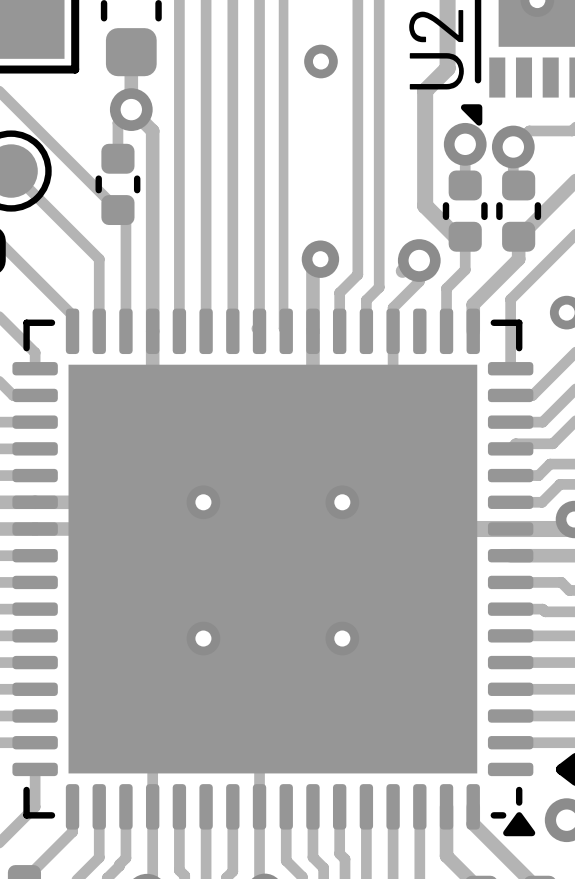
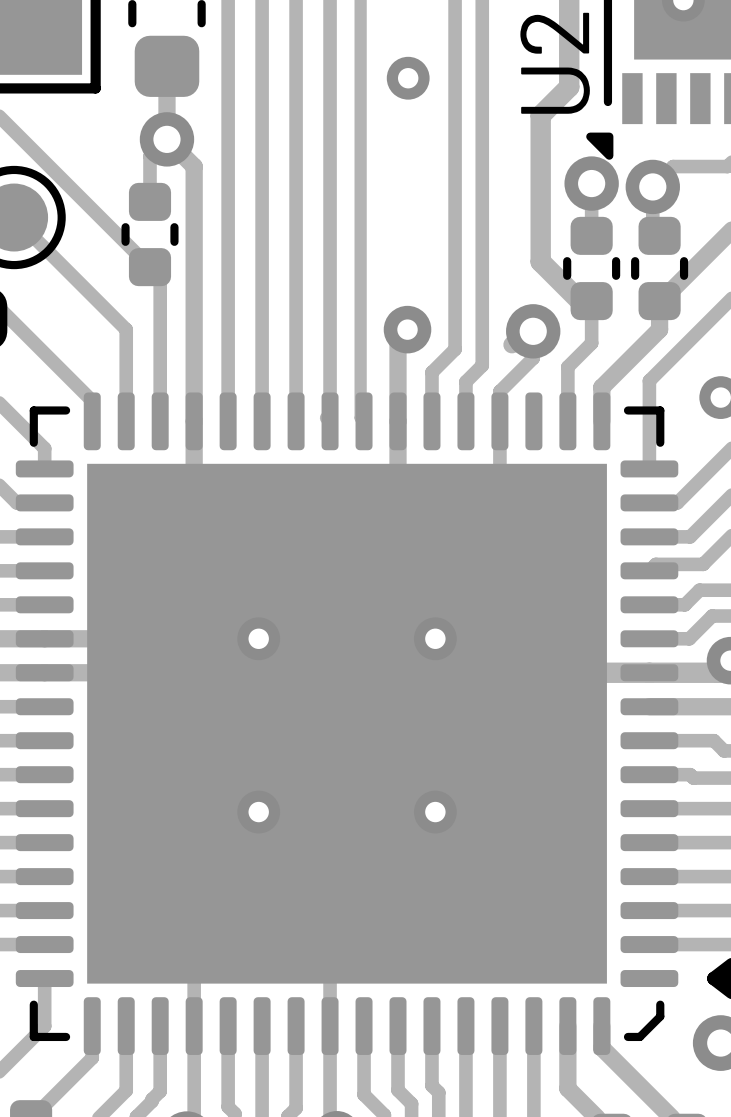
part footprint: [12, 308, 536, 837] -> [15, 392, 679, 1055]

